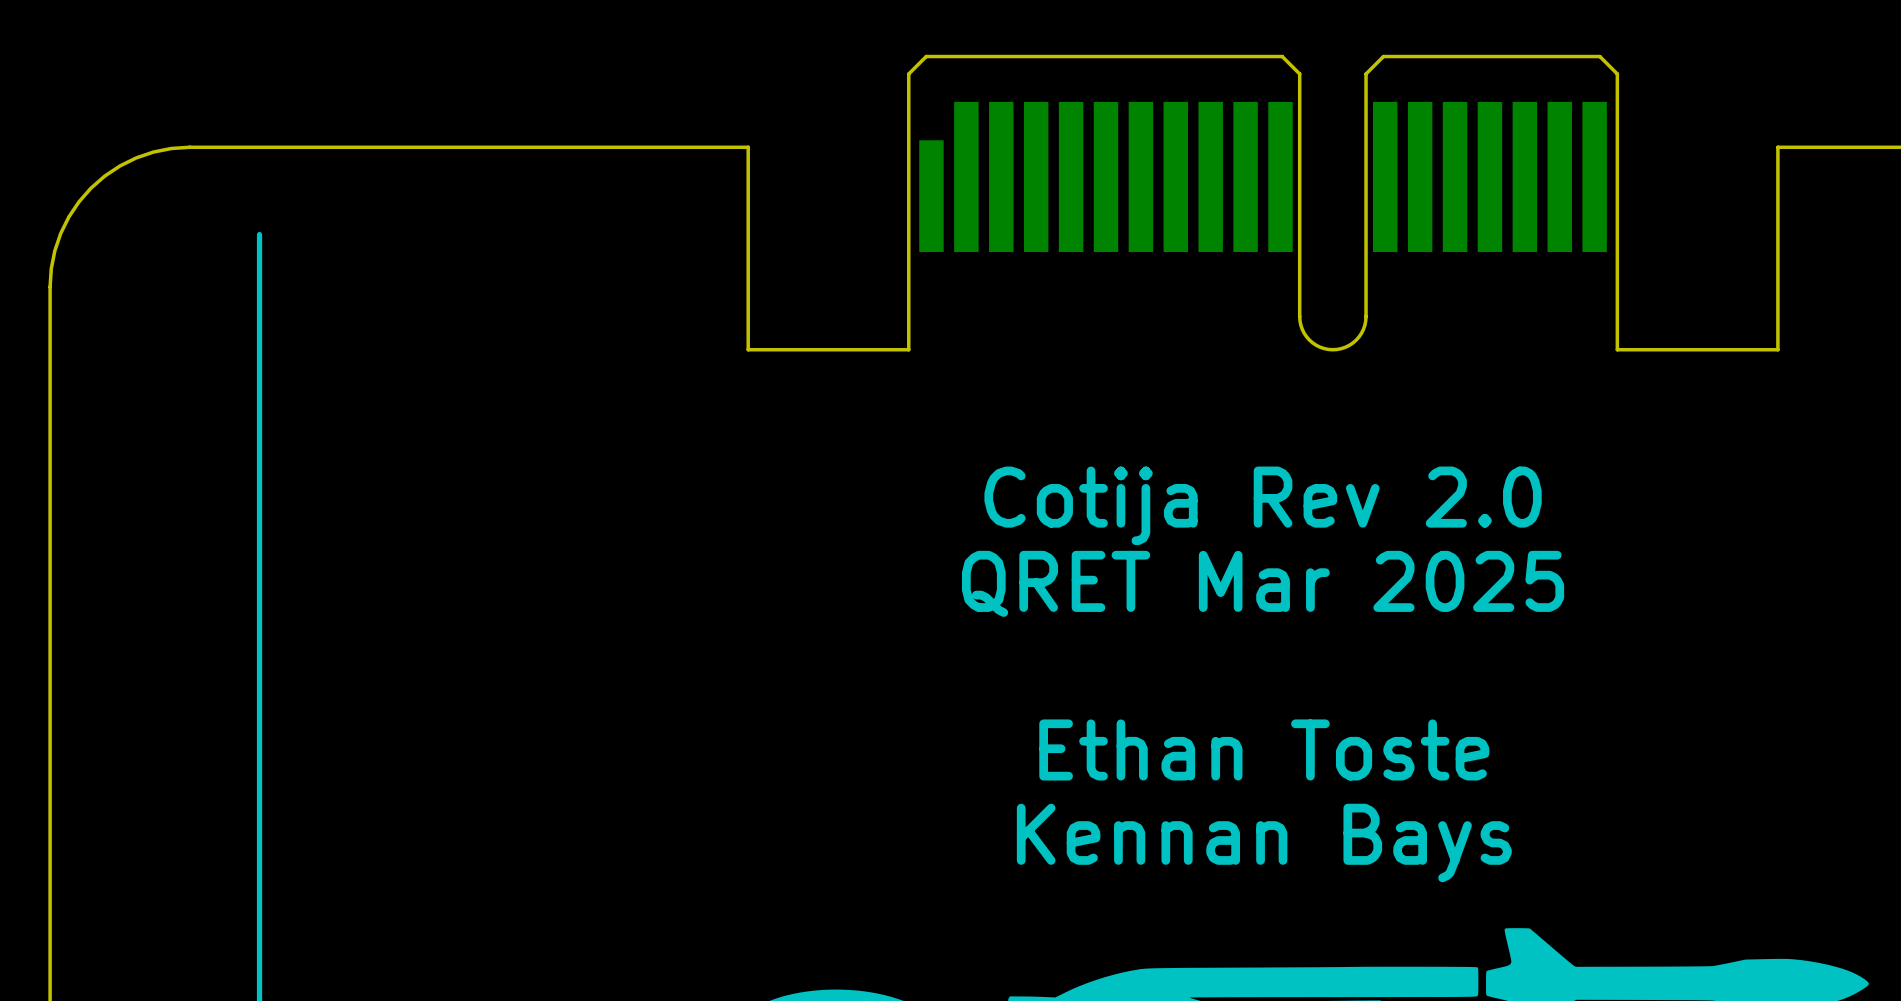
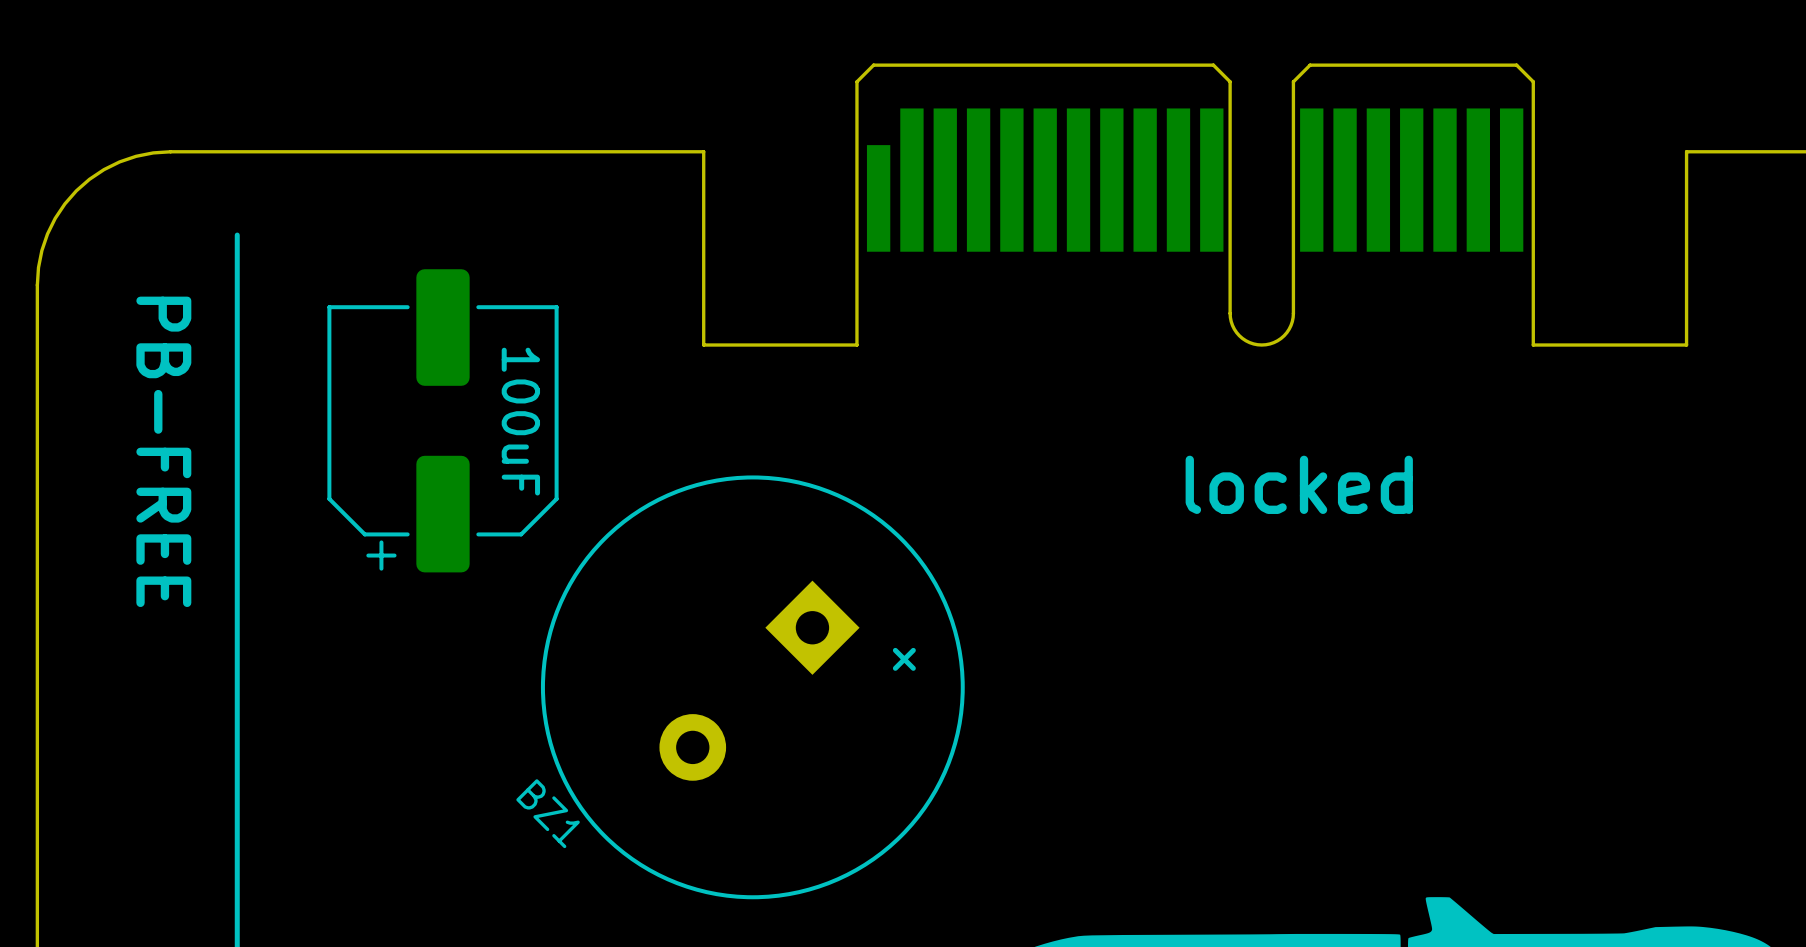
part: none -> 100uF (442, 420)
text: none -> PB-FREE (163, 451)
text: none -> locked (1299, 484)
text: Cotija Rev 2.0 (1263, 505) -> none
text: QRET Mar 2025 (1263, 583) -> none
BZ1: none -> (752, 687)
text: Ethan Toste (1264, 749) -> none
text: Kennan Bays (1264, 842) -> none

